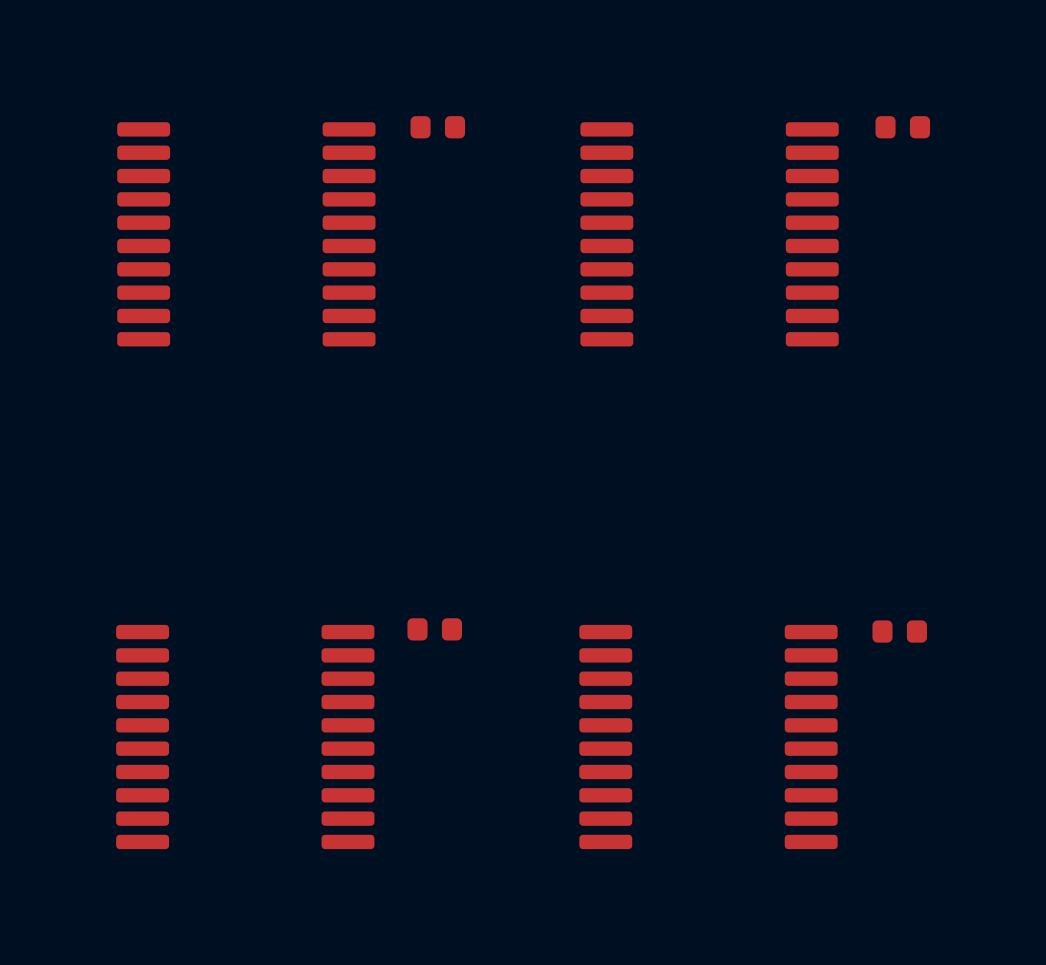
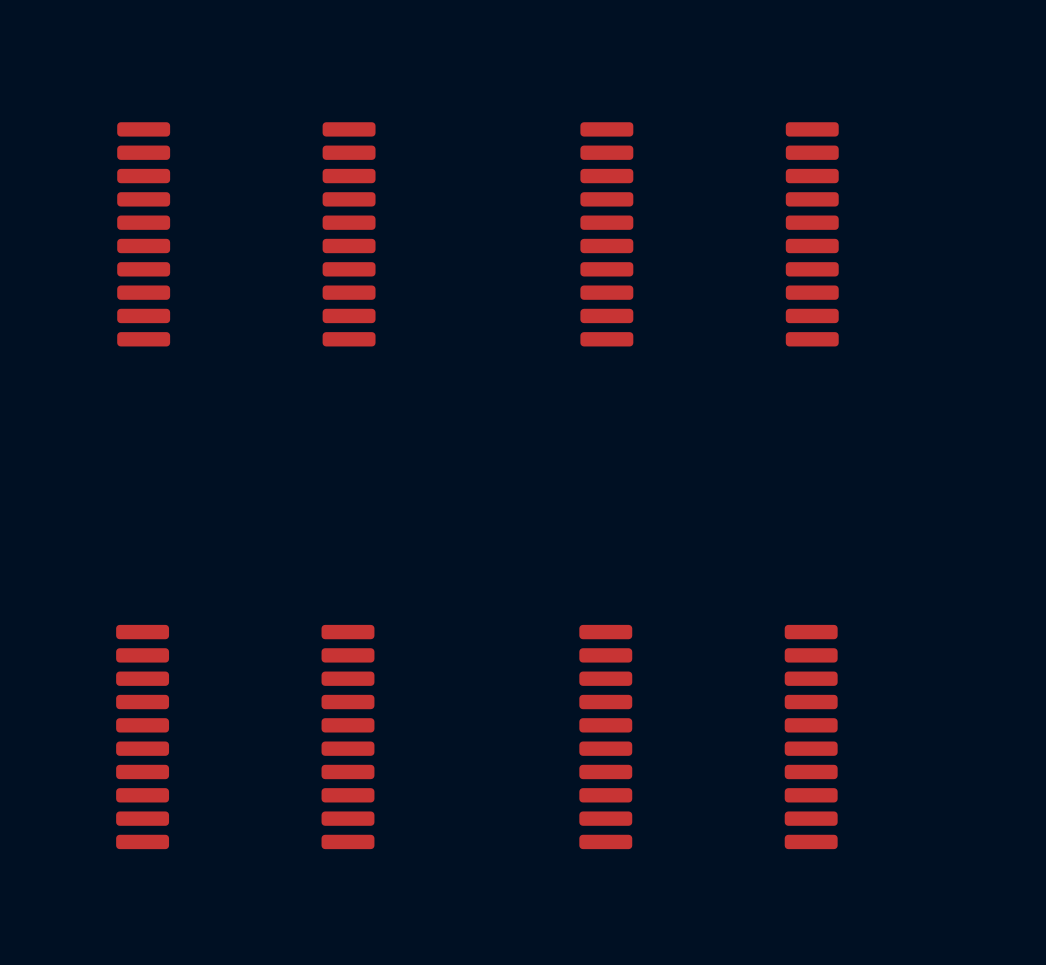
part: (437, 127) -> none
part: (902, 127) -> none
part: (434, 629) -> none
part: (899, 631) -> none

